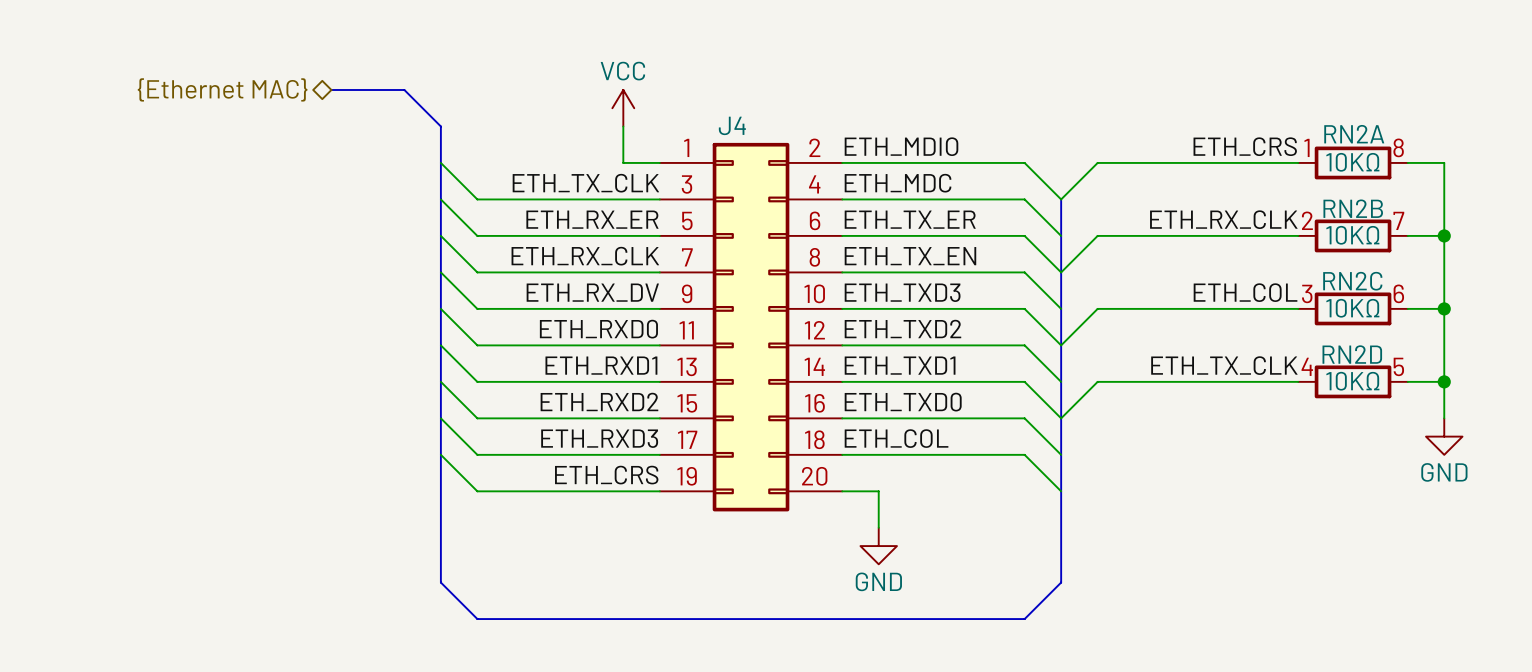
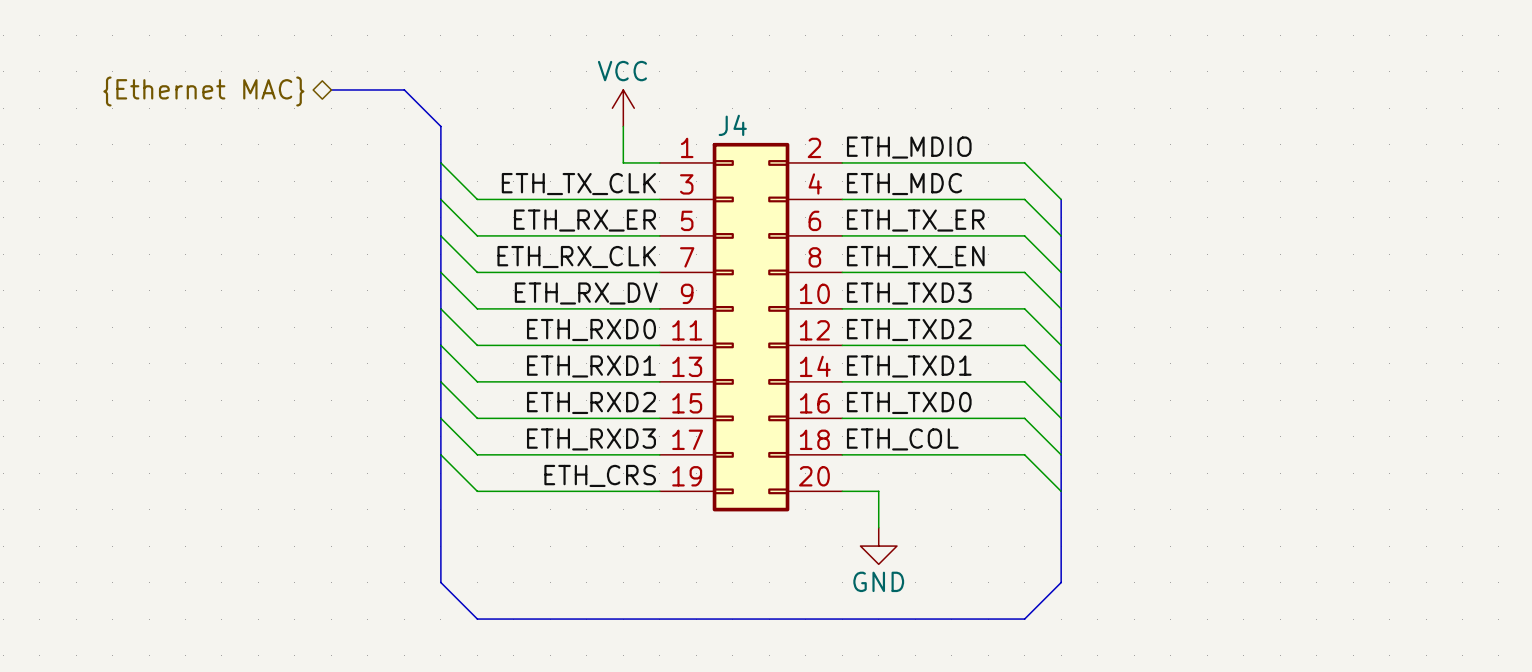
label: ETH_CRS (1245, 146) -> none
wire: (1298, 162) (1097, 162) (1061, 199) -> none
RN2A: 10KΩ (1353, 162) -> none
wire: (1407, 162) (1444, 162) (1444, 418) -> none
label: ETH_RX_CLK (1223, 219) -> none
wire: (1298, 235) (1097, 235) (1061, 272) -> none
RN2B: 10KΩ (1353, 235) -> none
wire: (1407, 235) (1444, 235) -> none
junction: (1444, 235) -> none
label: ETH_COL (1245, 292) -> none
wire: (1298, 308) (1097, 308) (1061, 345) -> none
RN2C: 10KΩ (1353, 308) -> none
wire: (1407, 308) (1444, 308) -> none
junction: (1444, 308) -> none
label: ETH_TX_CLK (1224, 365) -> none
wire: (1298, 381) (1097, 381) (1061, 418) -> none
RN2D: 10KΩ (1353, 381) -> none
wire: (1407, 381) (1444, 381) -> none
junction: (1444, 381) -> none
power symbol: GND (1444, 436) -> none

